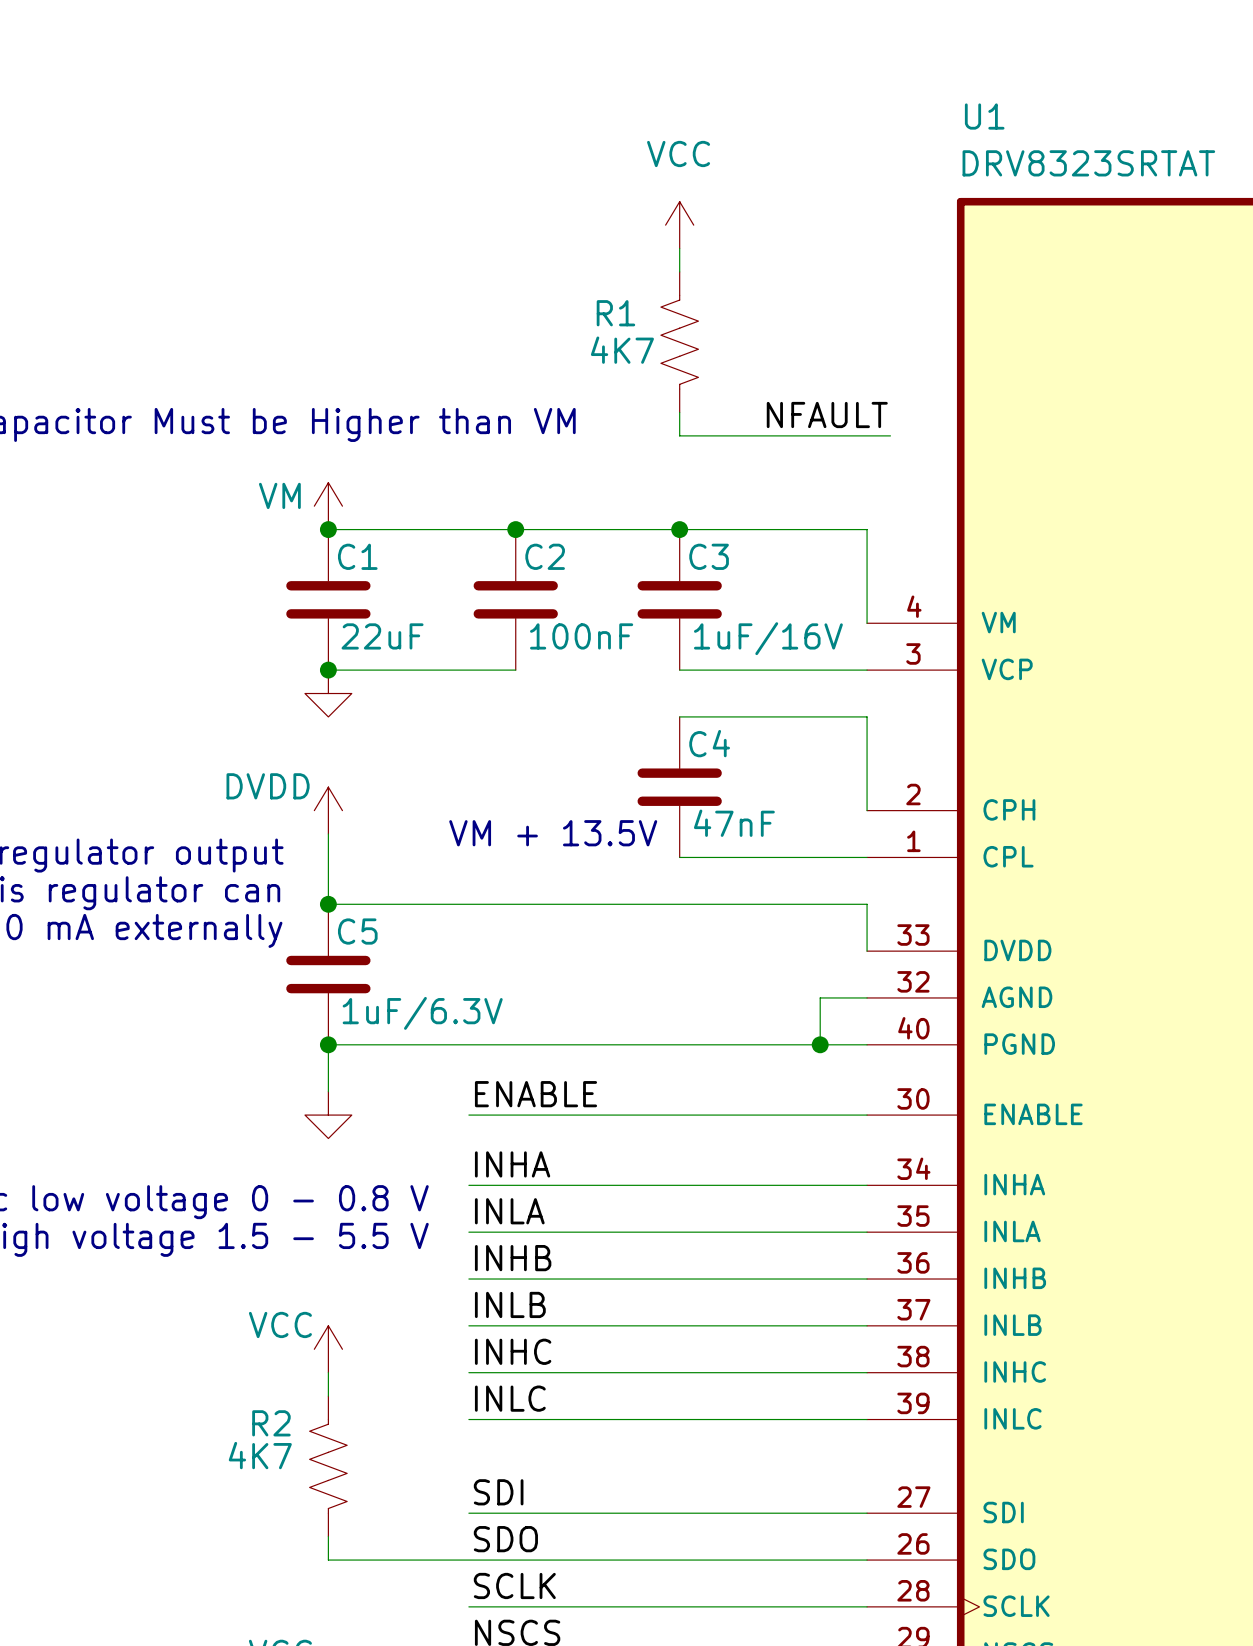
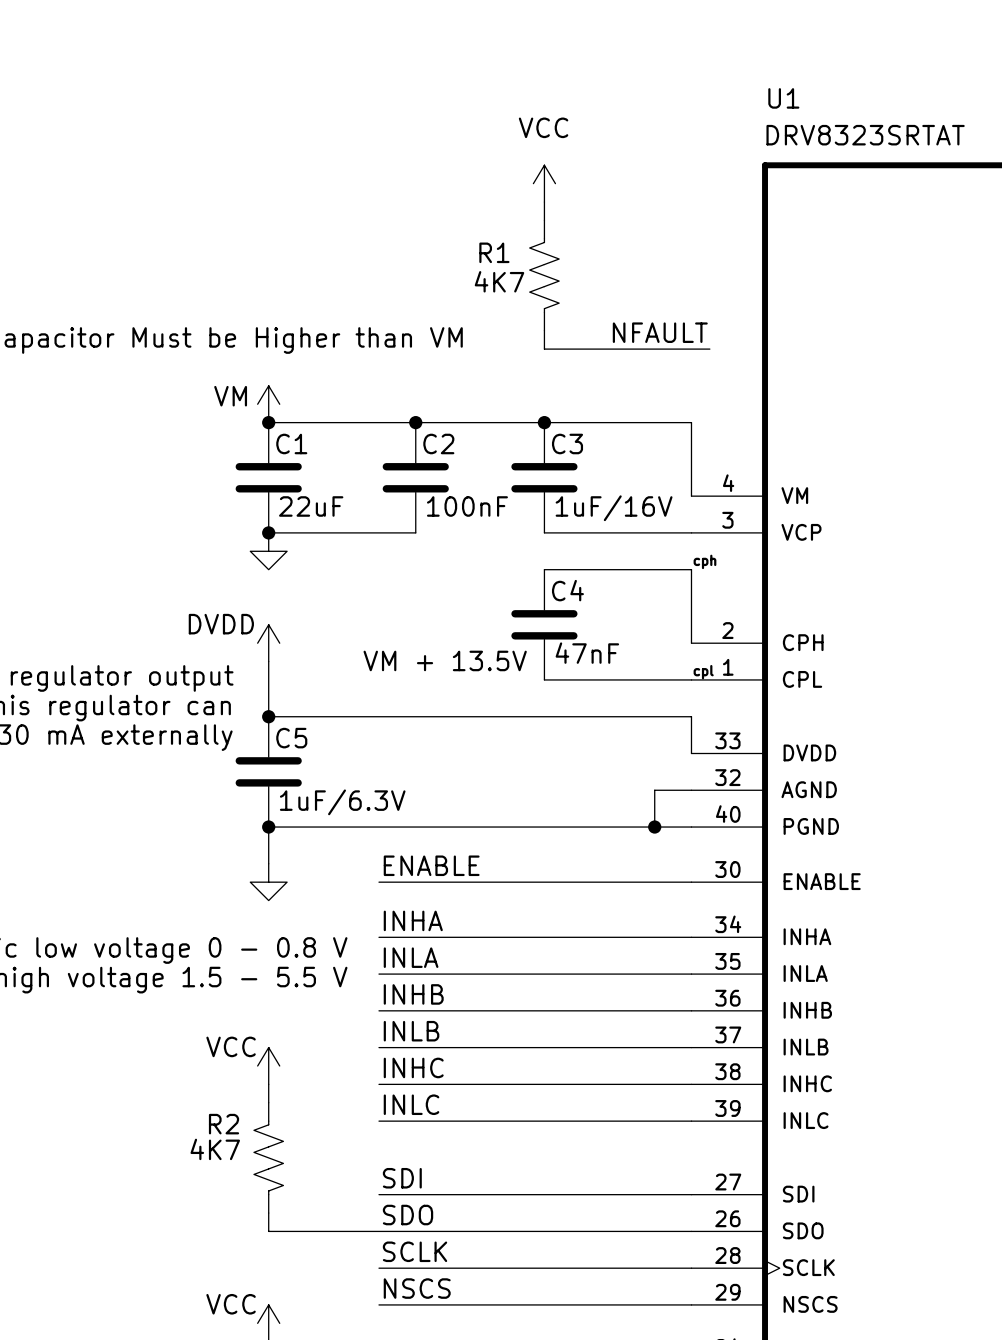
label: none -> cph (704, 561)
label: none -> cpl (703, 672)

